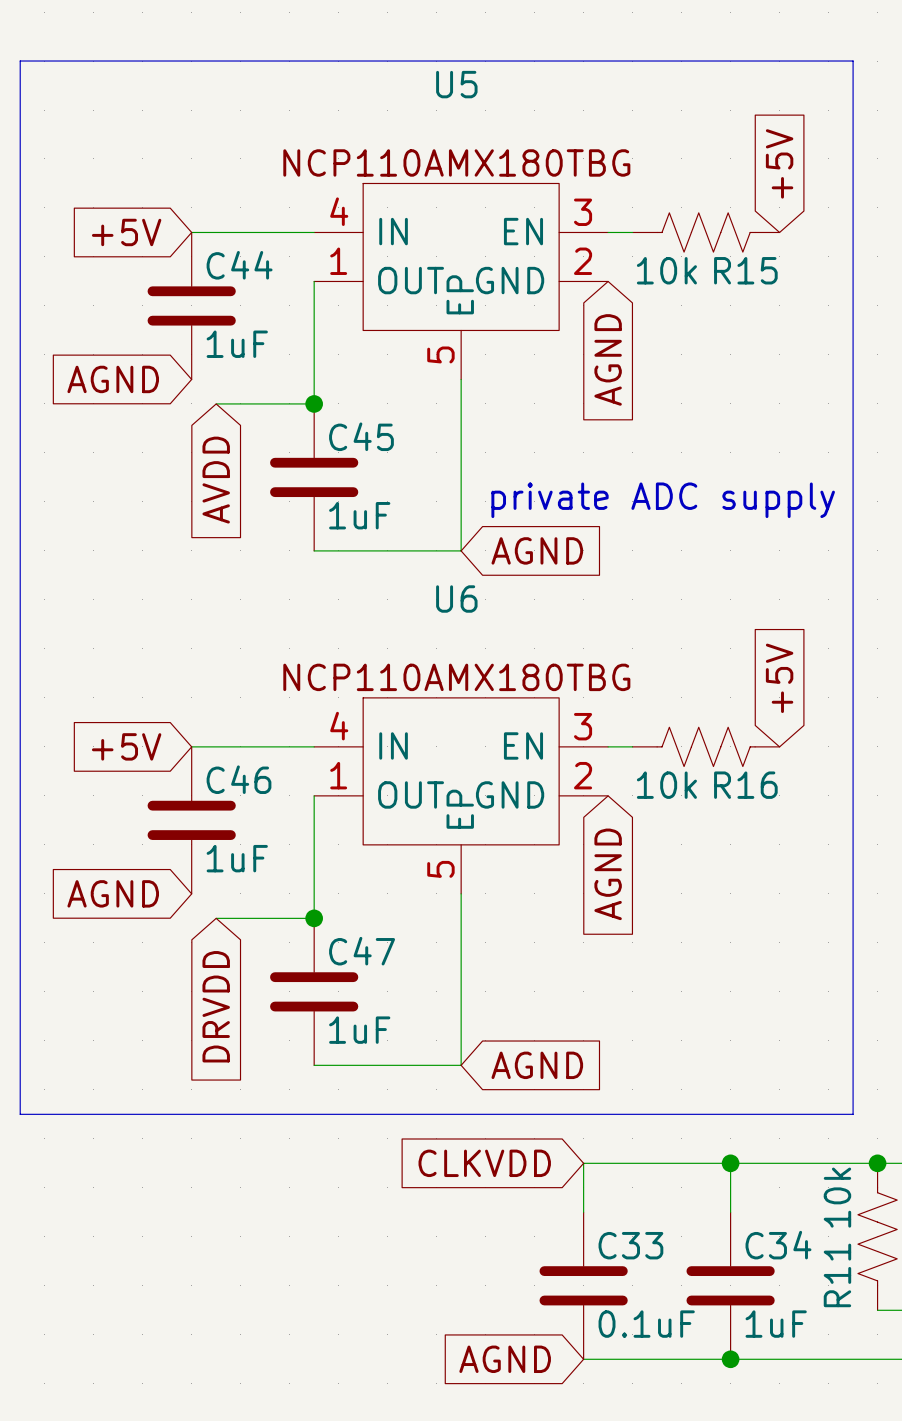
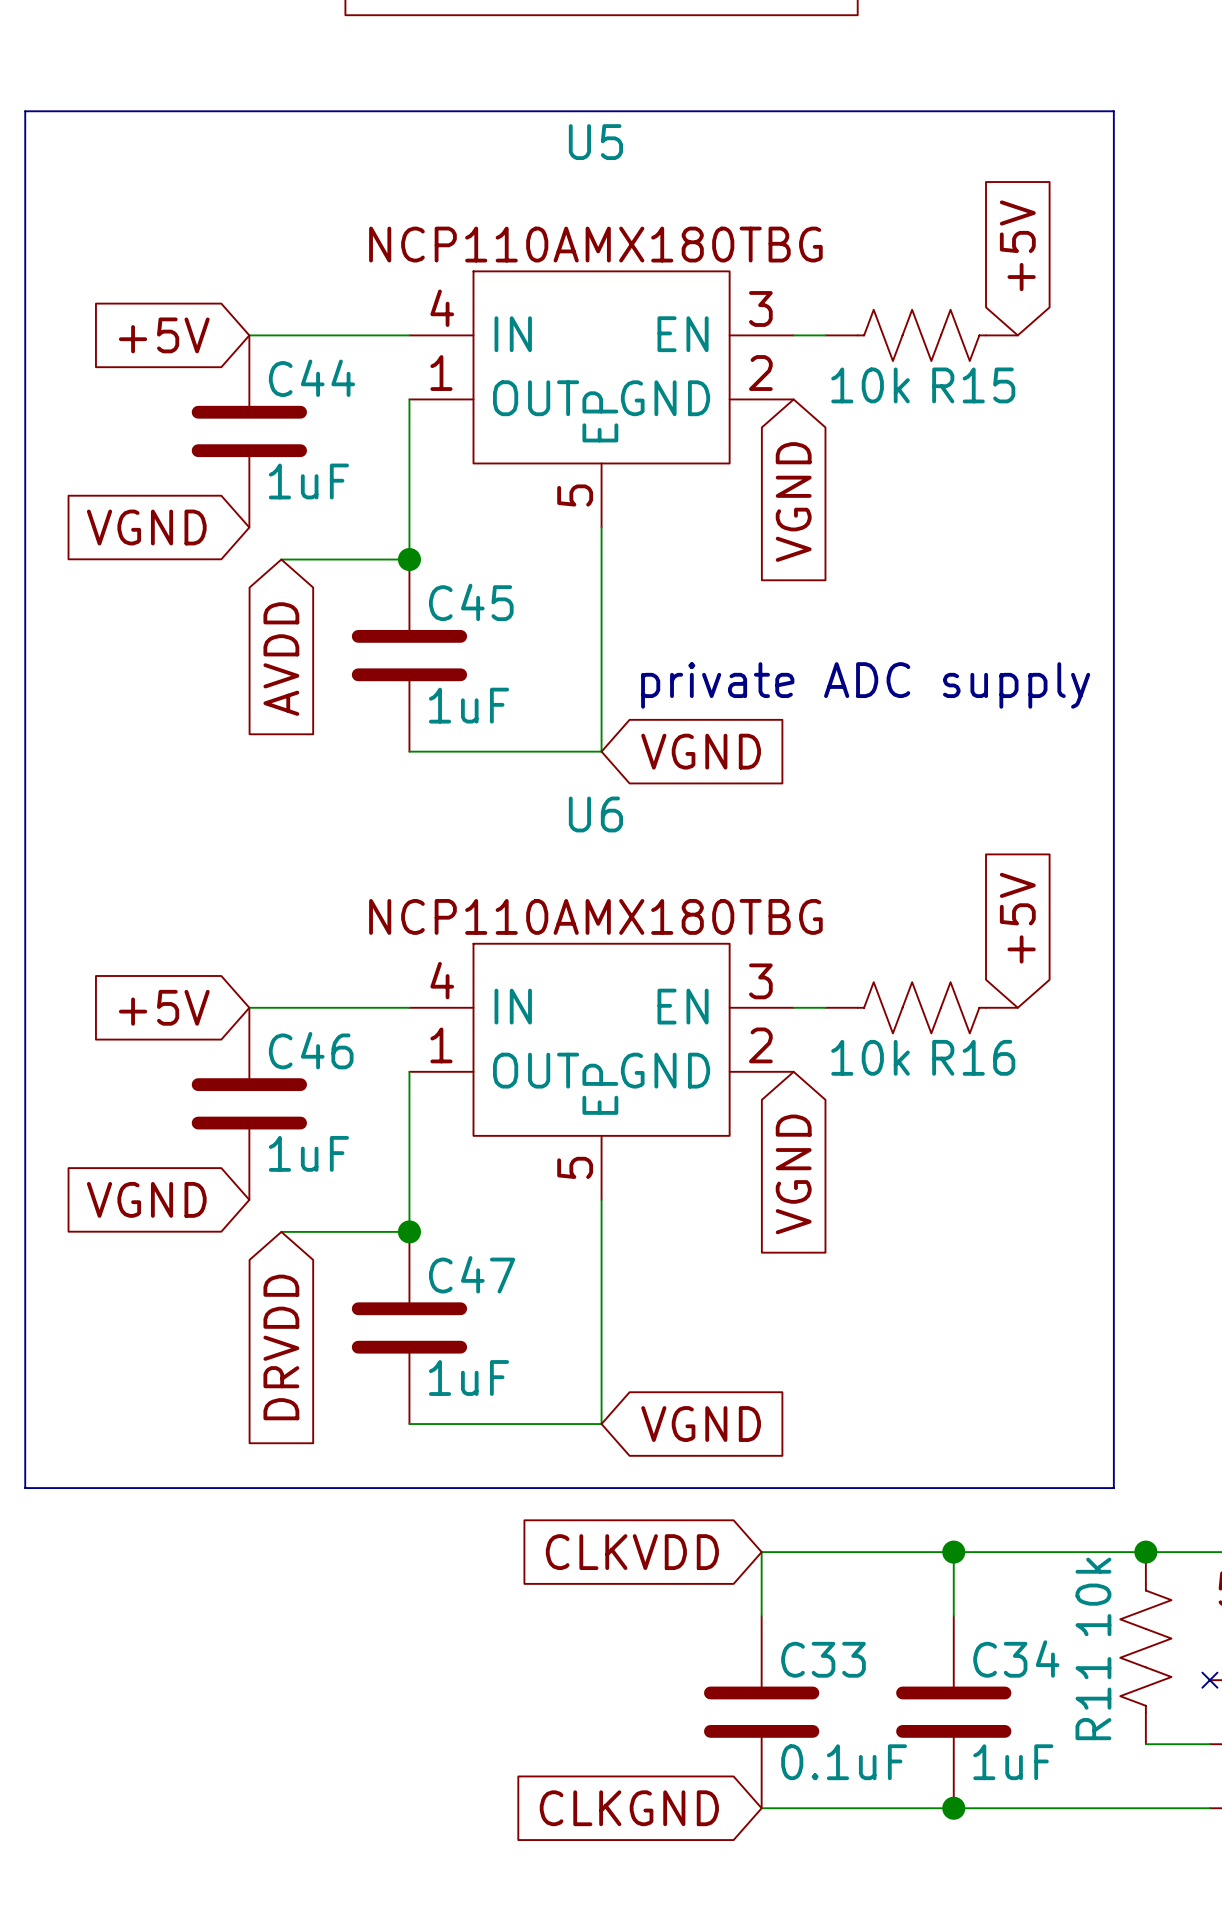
global label: AGND (608, 359) -> VGND (793, 502)
global label: AGND (113, 379) -> VGND (146, 527)
global label: AGND (537, 550) -> VGND (701, 751)
global label: AGND (608, 874) -> VGND (793, 1174)
global label: AGND (113, 893) -> VGND (146, 1199)
global label: AGND (537, 1065) -> VGND (701, 1424)
global label: AGND (505, 1359) -> CLKGND (629, 1808)

